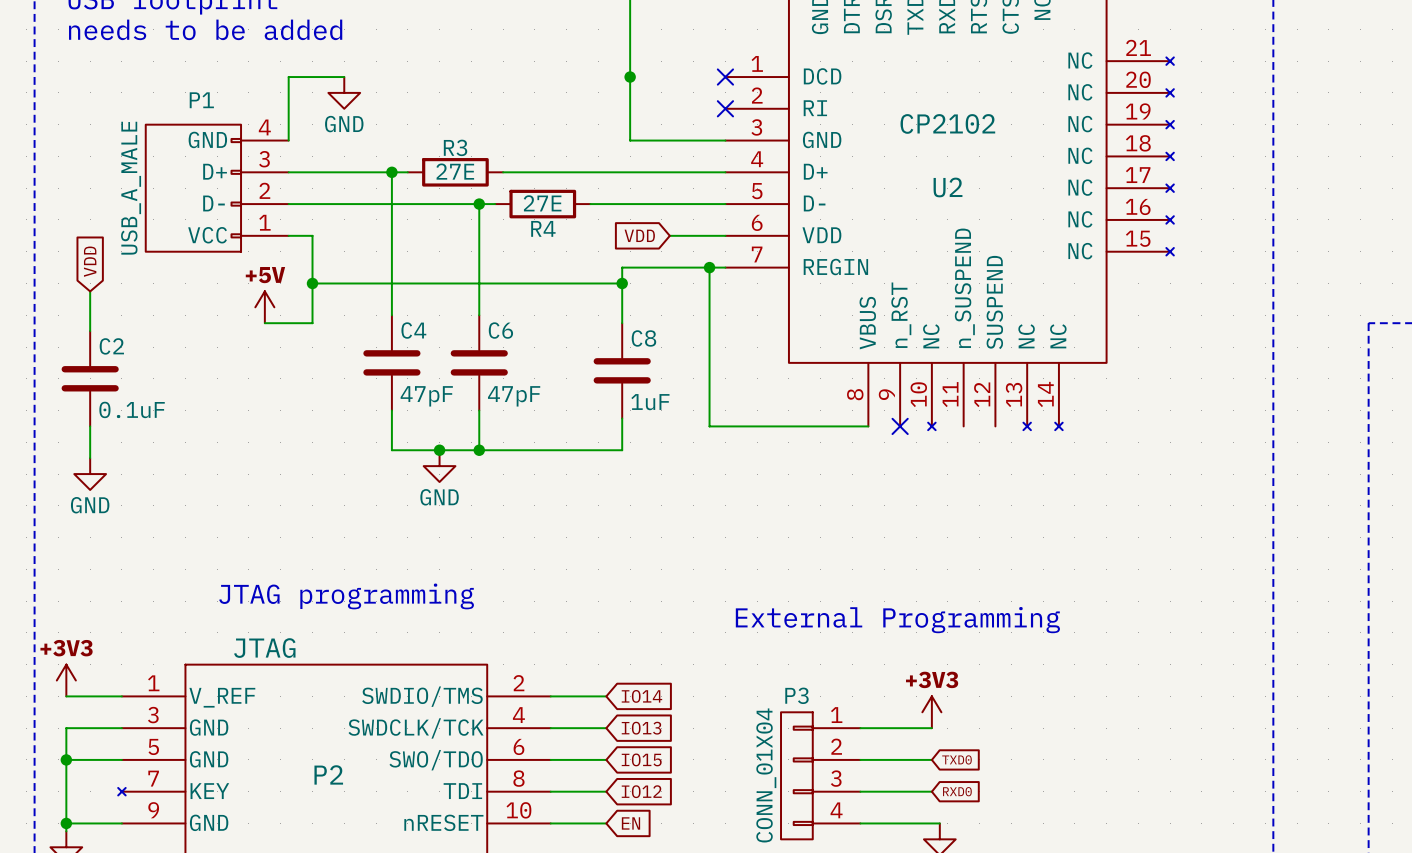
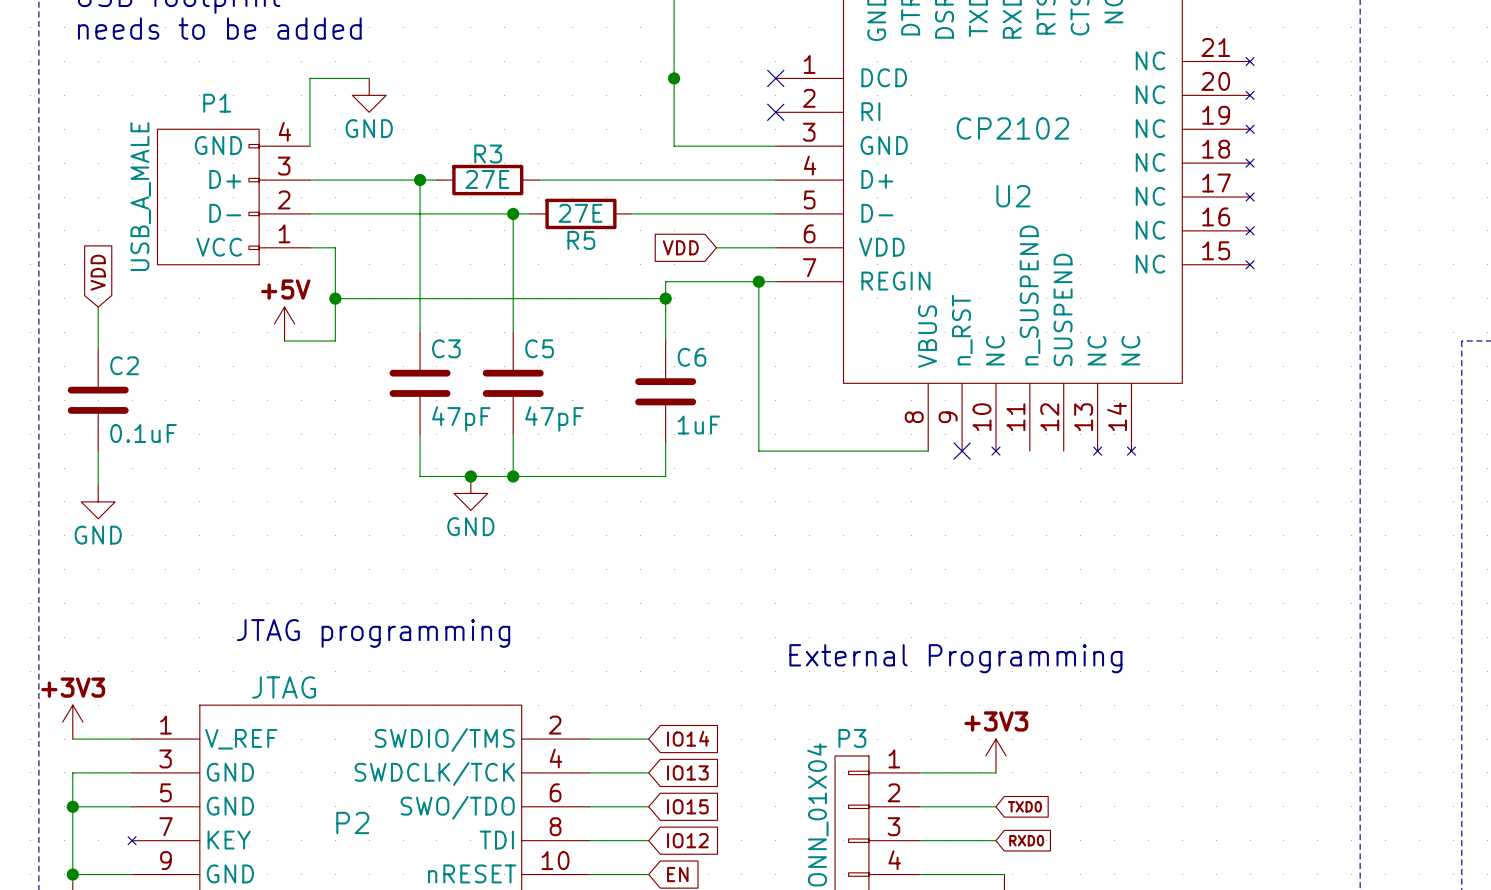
R4 name: R4 (543, 228) -> R5 (581, 240)
C4 name: C4 (413, 330) -> C3 (446, 348)
C6 name: C6 (500, 330) -> C5 (539, 348)
C8 name: C8 (643, 338) -> C6 (692, 357)

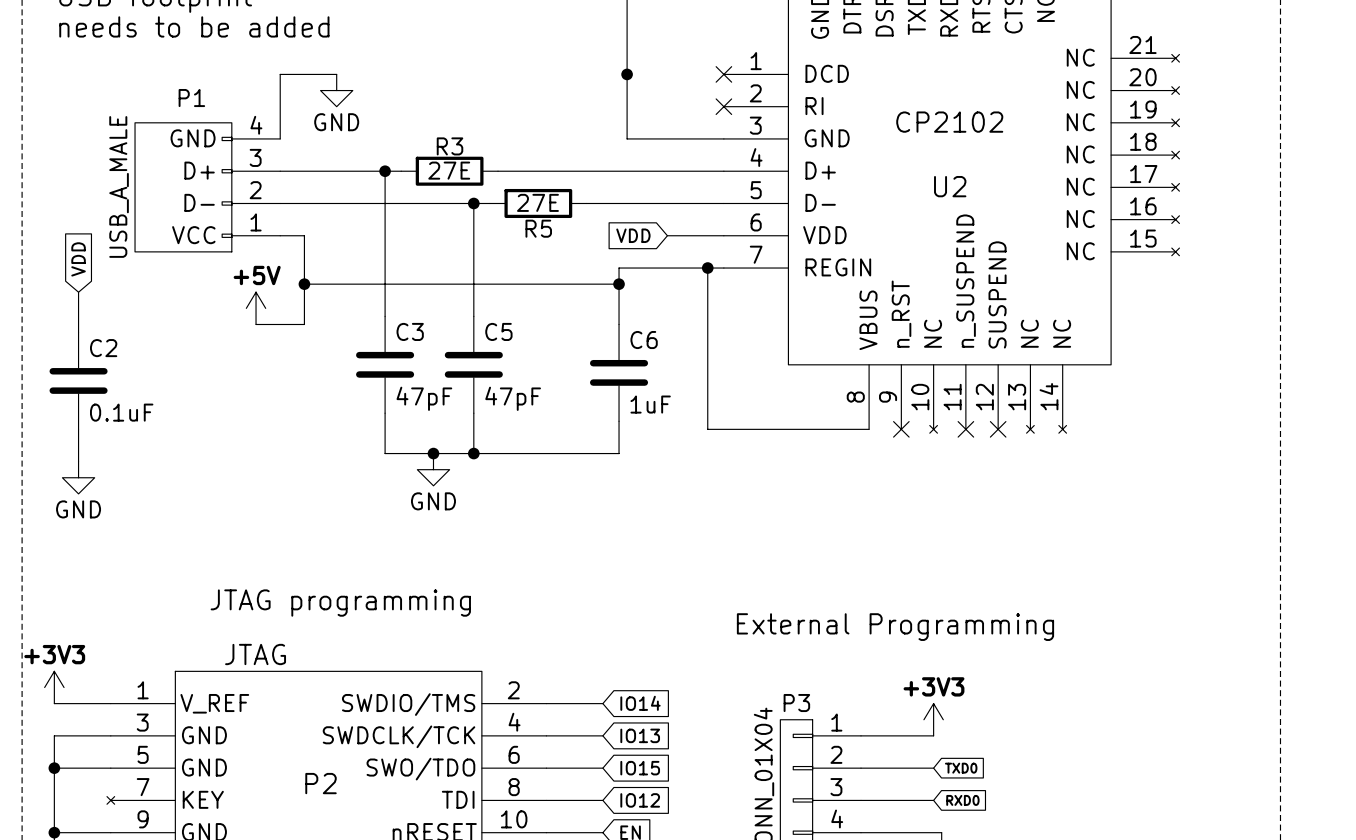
no-connect mark: none -> (965, 429)
no-connect mark: none -> (998, 429)

